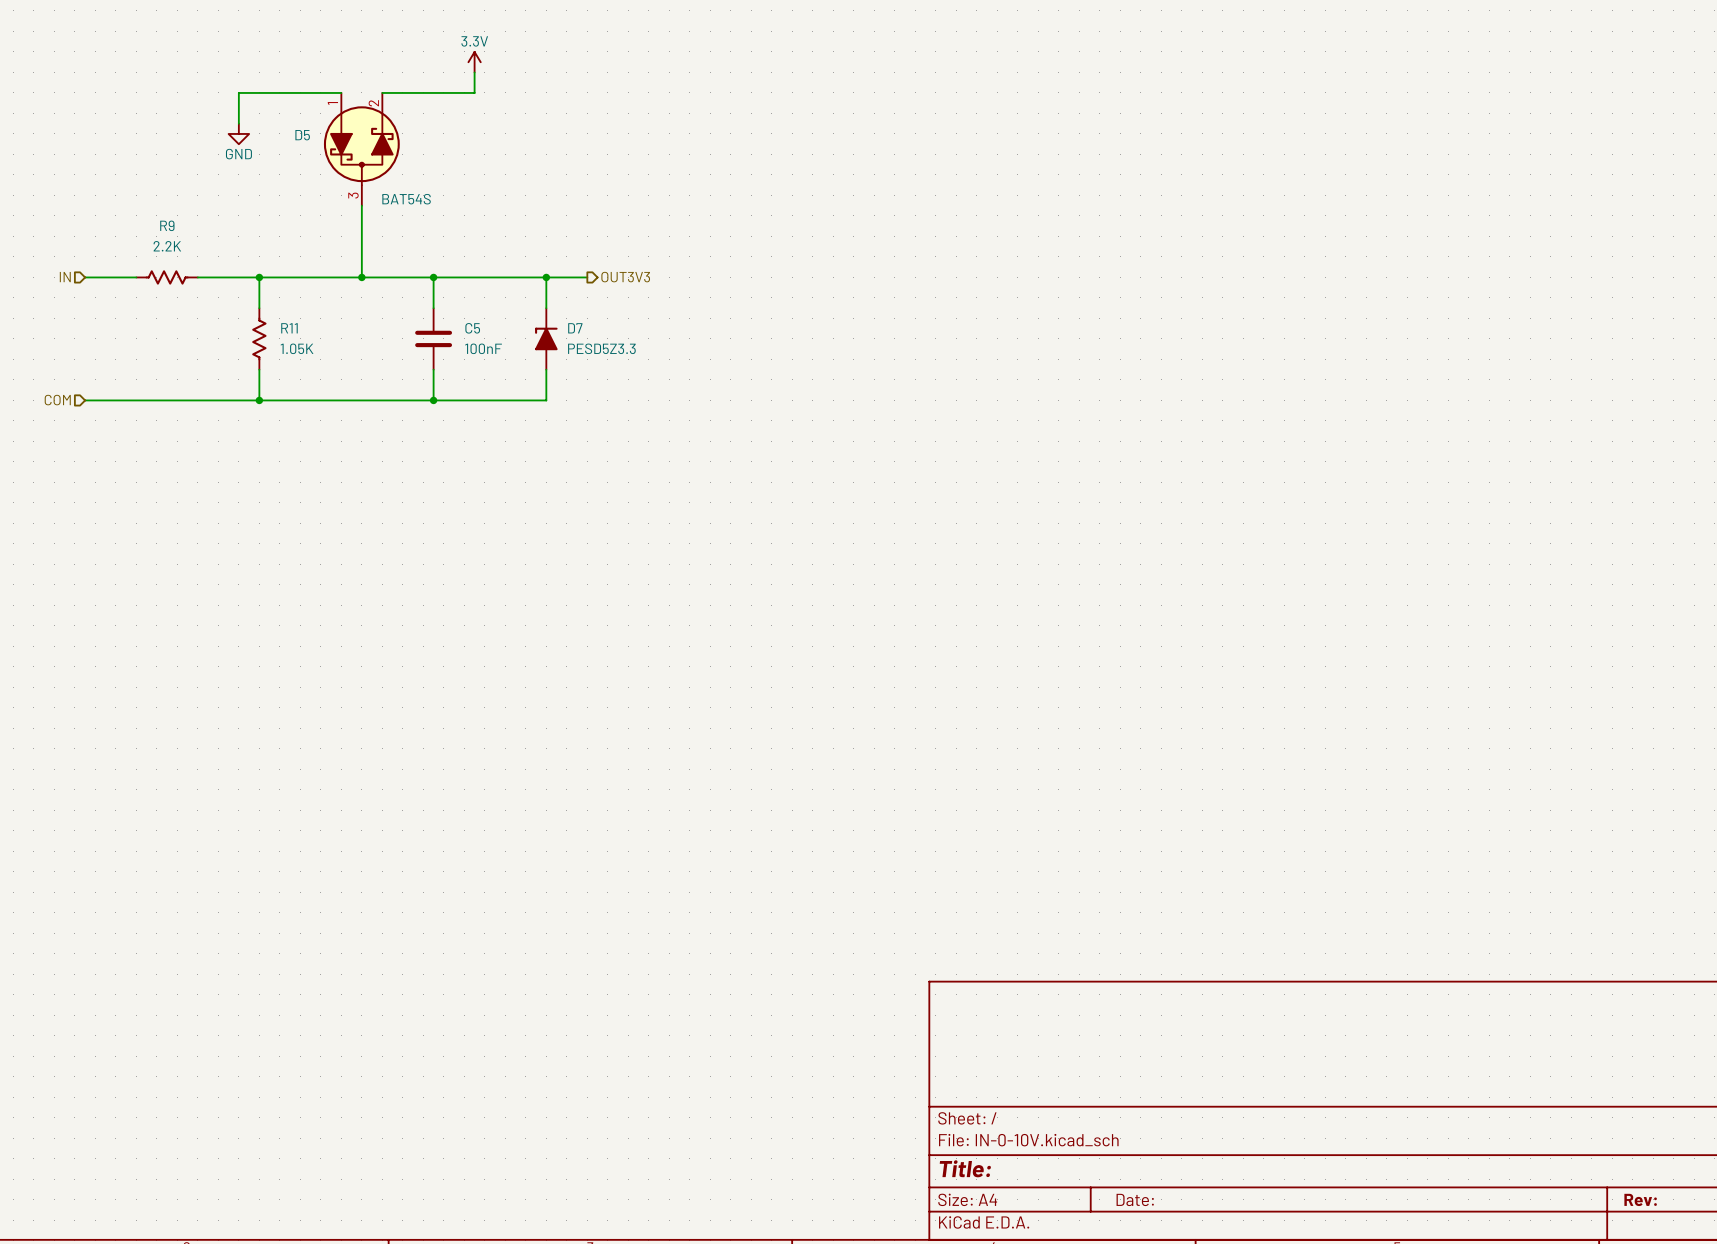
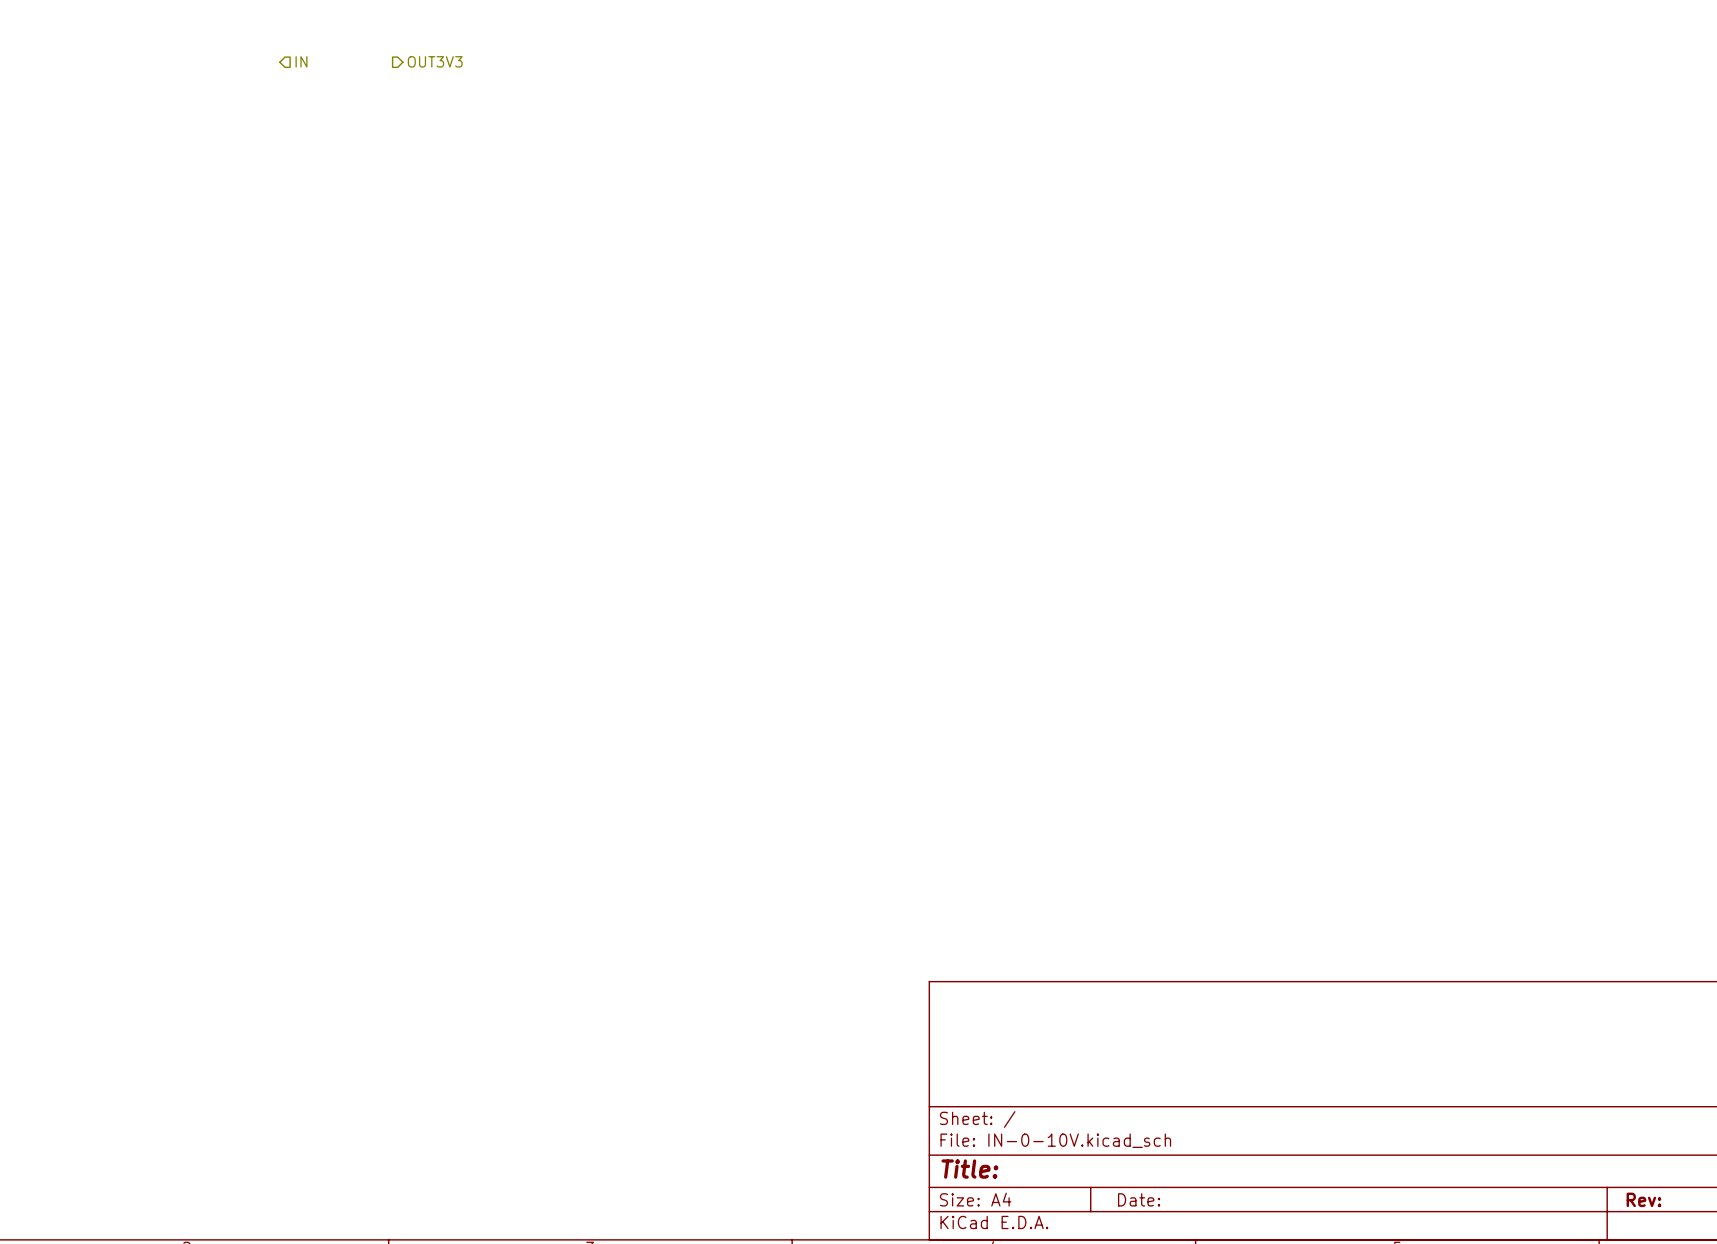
hierarchical label: none -> IN (301, 61)
hierarchical label: none -> OUT3V3 (435, 61)
power symbol: 3.3V (474, 62) -> none
wire: (474, 72) (474, 92) (382, 92) -> none
wire: (341, 92) (238, 92) (238, 123) -> none
power symbol: GND (238, 133) -> none
D5: BAT54S (361, 149) -> none
wire: (361, 205) (361, 277) -> none
hierarchical label: IN (65, 277) -> none
wire: (85, 277) (136, 277) -> none
R9: 2.2K (167, 277) -> none
wire: (197, 277) (587, 277) -> none
wire: (259, 277) (259, 308) -> none
junction: (259, 277) -> none
junction: (361, 277) -> none
wire: (433, 277) (433, 308) -> none
junction: (433, 277) -> none
wire: (546, 277) (546, 308) -> none
junction: (546, 277) -> none
hierarchical label: OUT3V3 (625, 277) -> none
R11: 1.05K (259, 338) -> none
C5: 100nF (433, 338) -> none
D7: PESD5Z3.3 (546, 338) -> none
wire: (259, 369) (259, 400) -> none
wire: (433, 369) (433, 400) -> none
wire: (546, 369) (546, 400) (85, 400) -> none
hierarchical label: COM (57, 400) -> none
junction: (259, 400) -> none
junction: (433, 400) -> none

